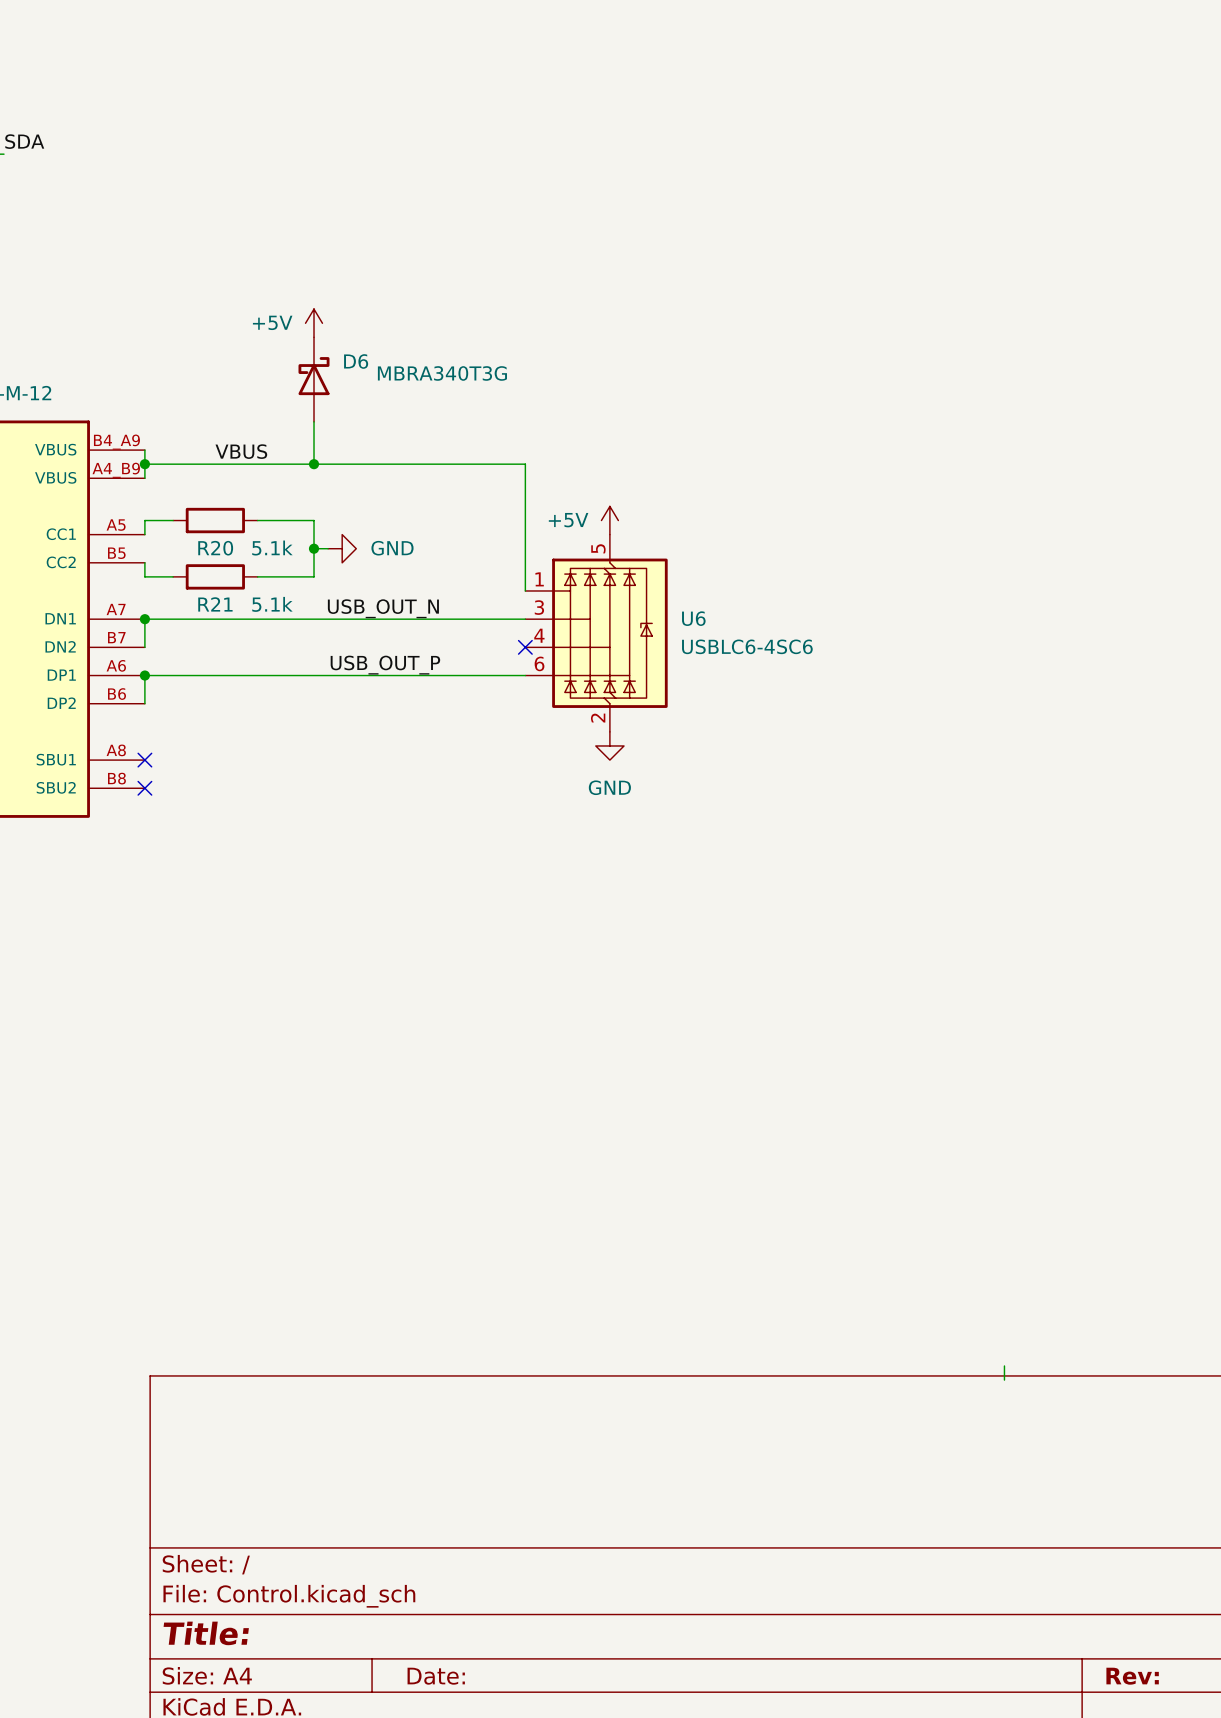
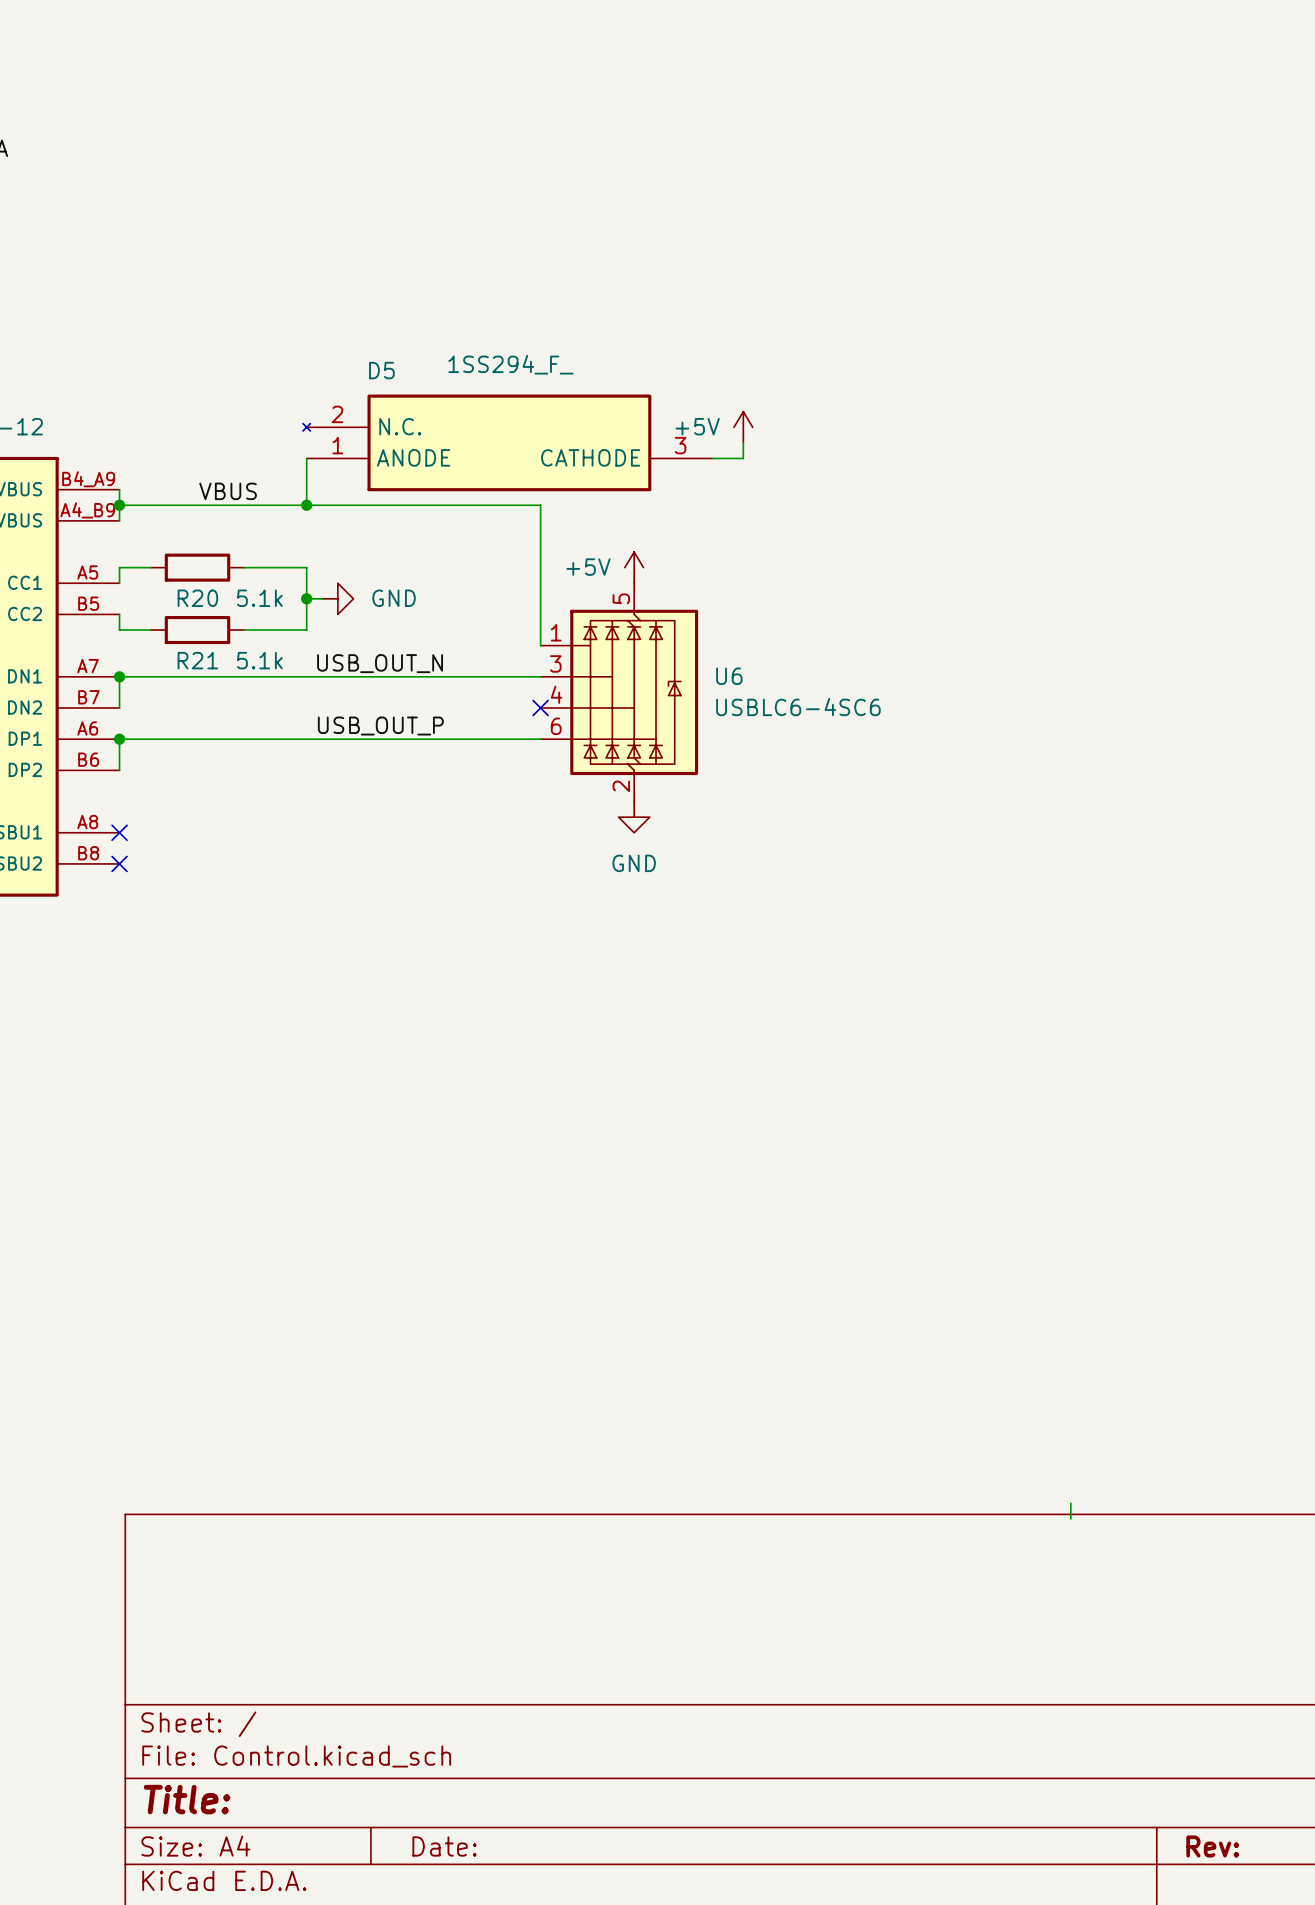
power symbol: +5V (314, 323) -> none
D6: MBRA340T3G (314, 379) -> none
power symbol: none -> +5V (743, 427)
D5: none -> 1SS294_F_ (507, 442)
wire: none -> (743, 442) (743, 458) (712, 458)

